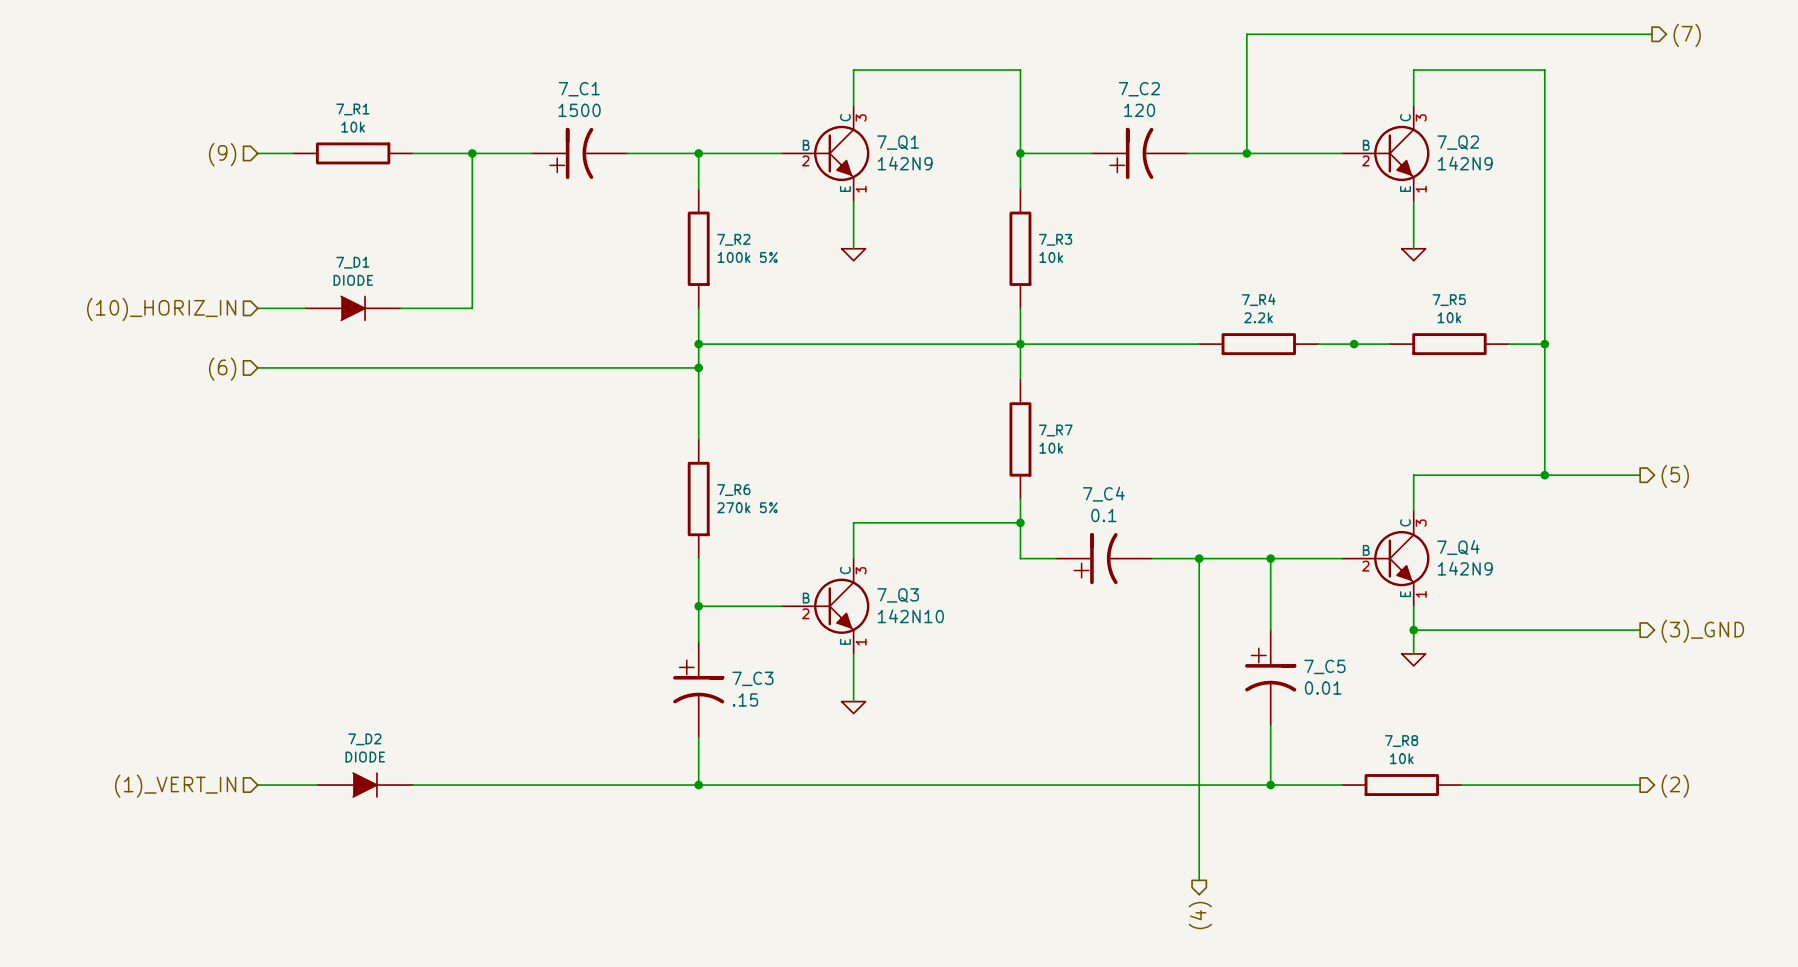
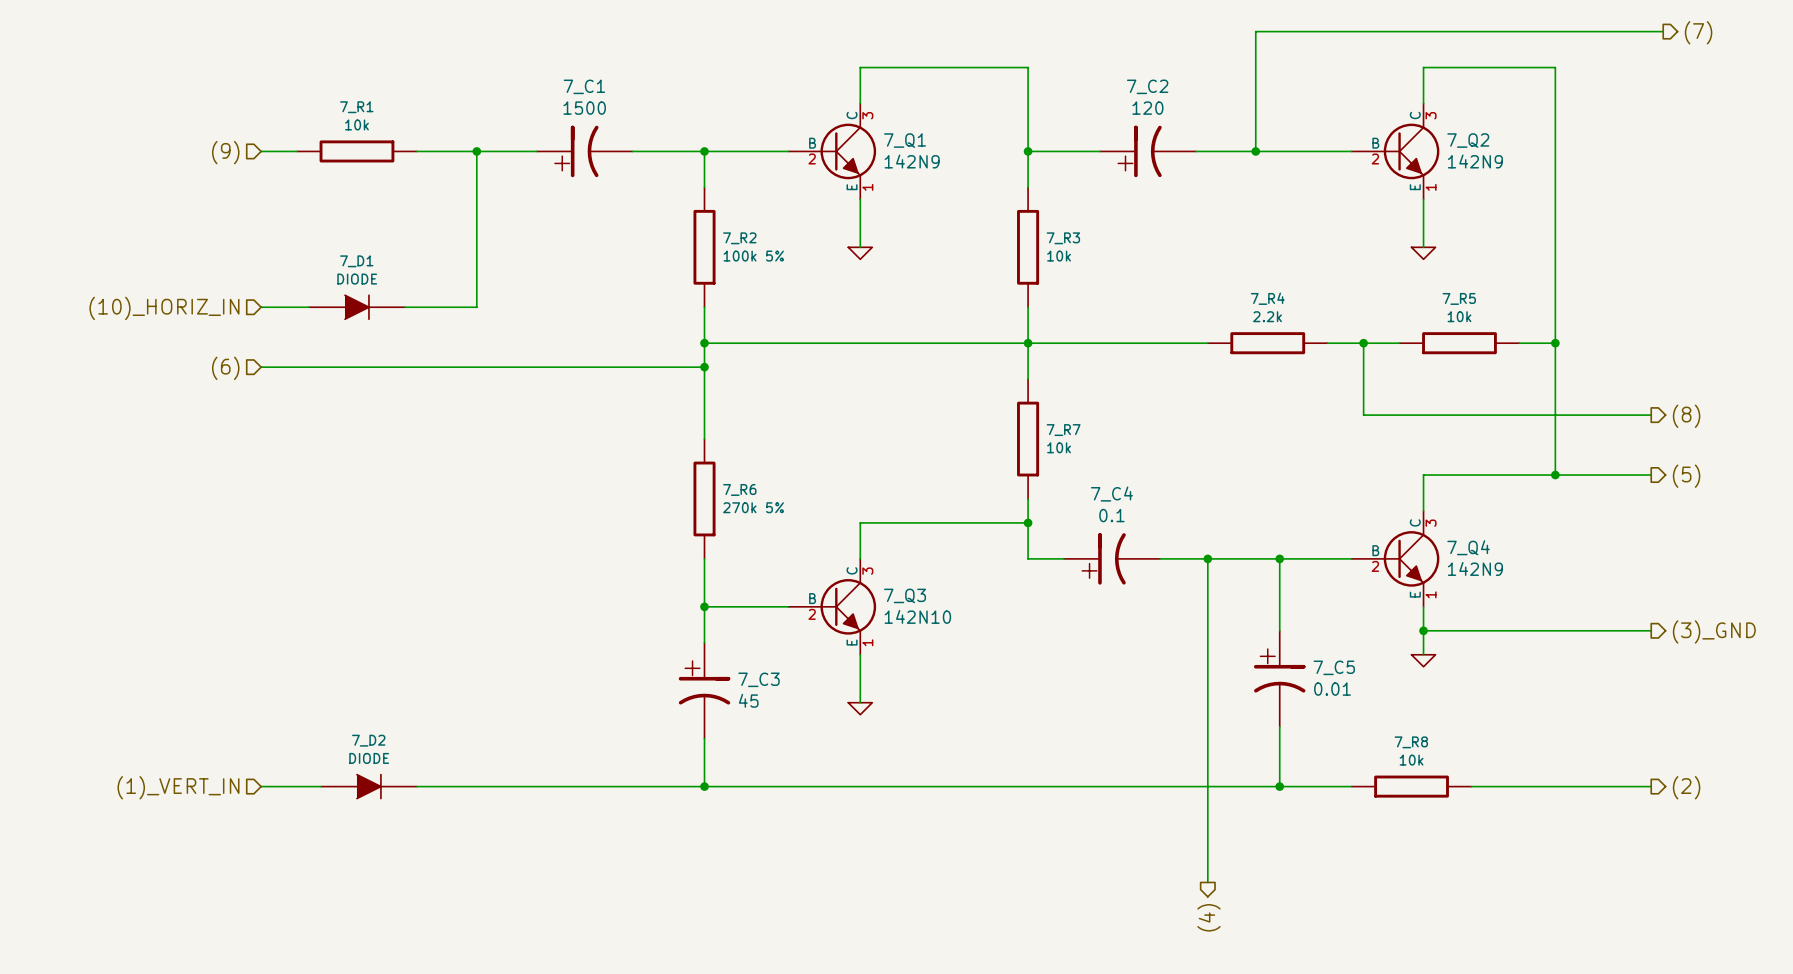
wire: none -> (1363, 343) (1363, 415) (1651, 415)
hierarchical label: none -> (8) (1686, 416)
7_C3 value: .15 (745, 699) -> 45 (748, 700)

